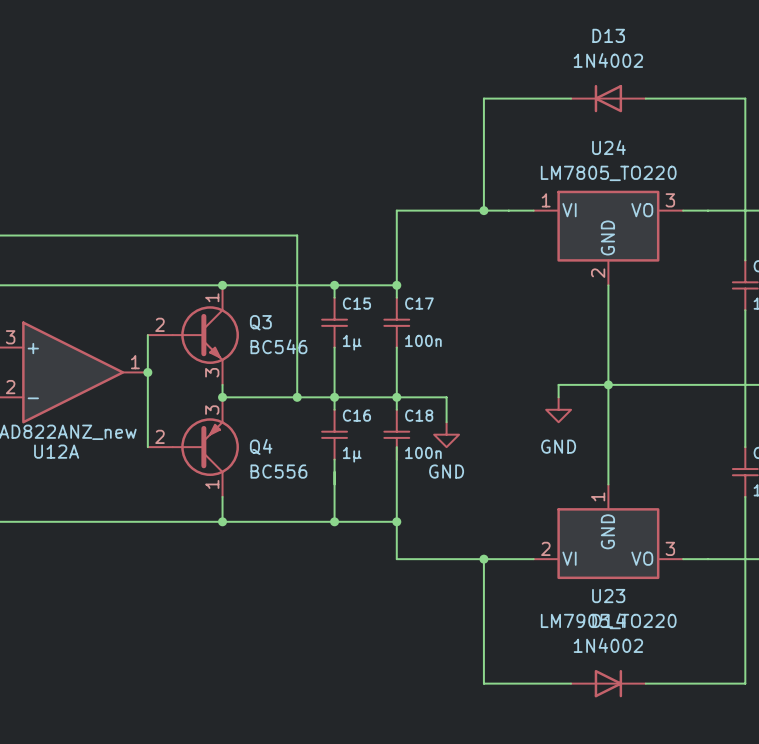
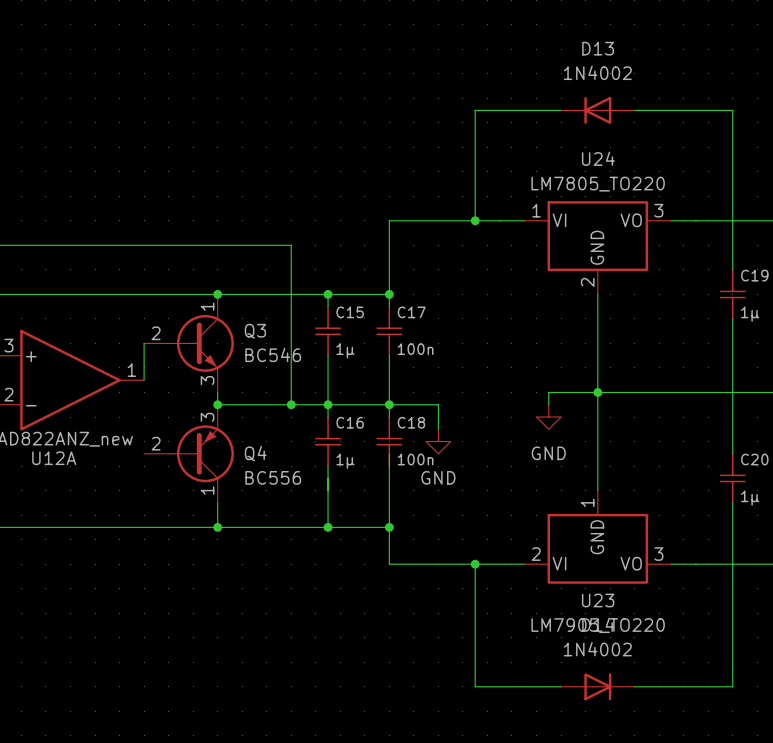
wire: (147, 372) (147, 447) -> none
junction: (147, 372) -> none

